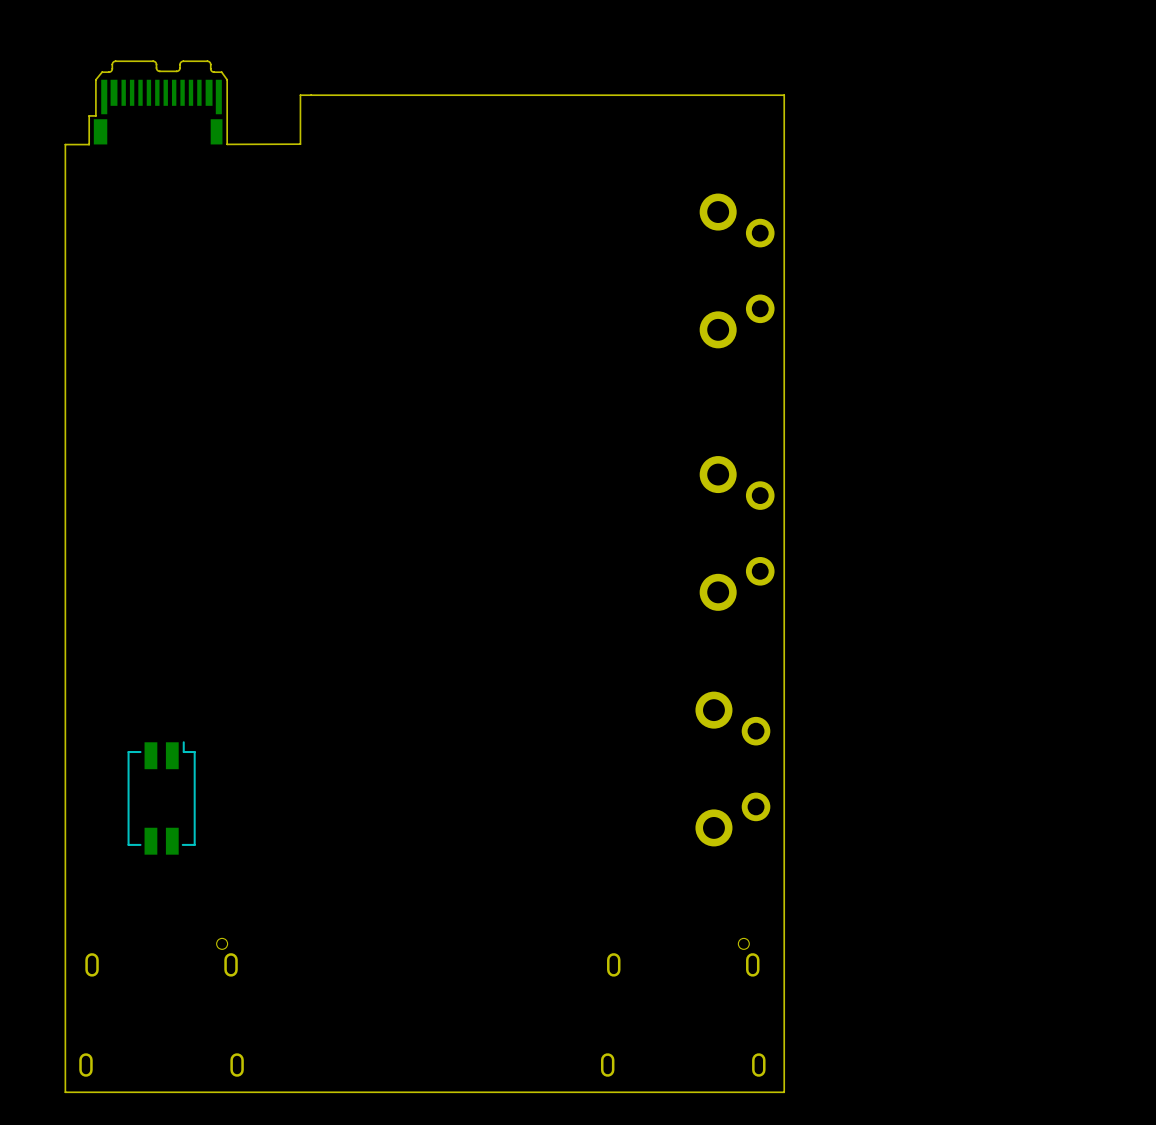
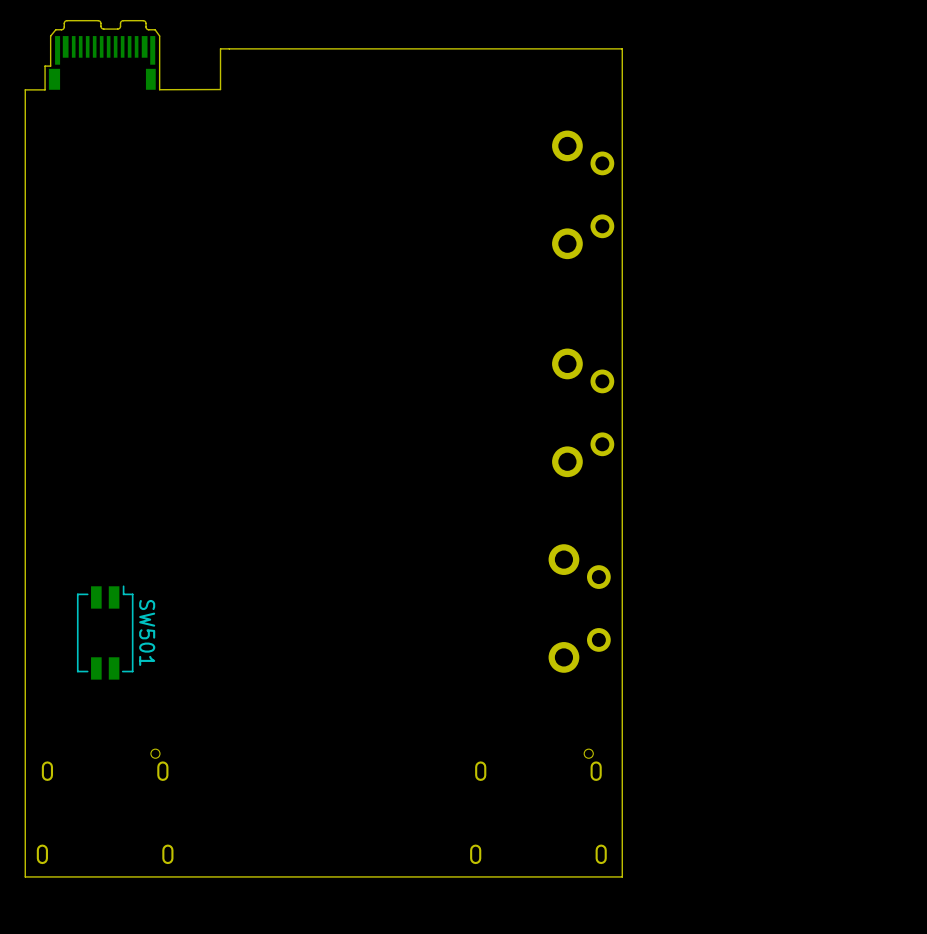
SW501 name: none -> SW501 (147, 632)

